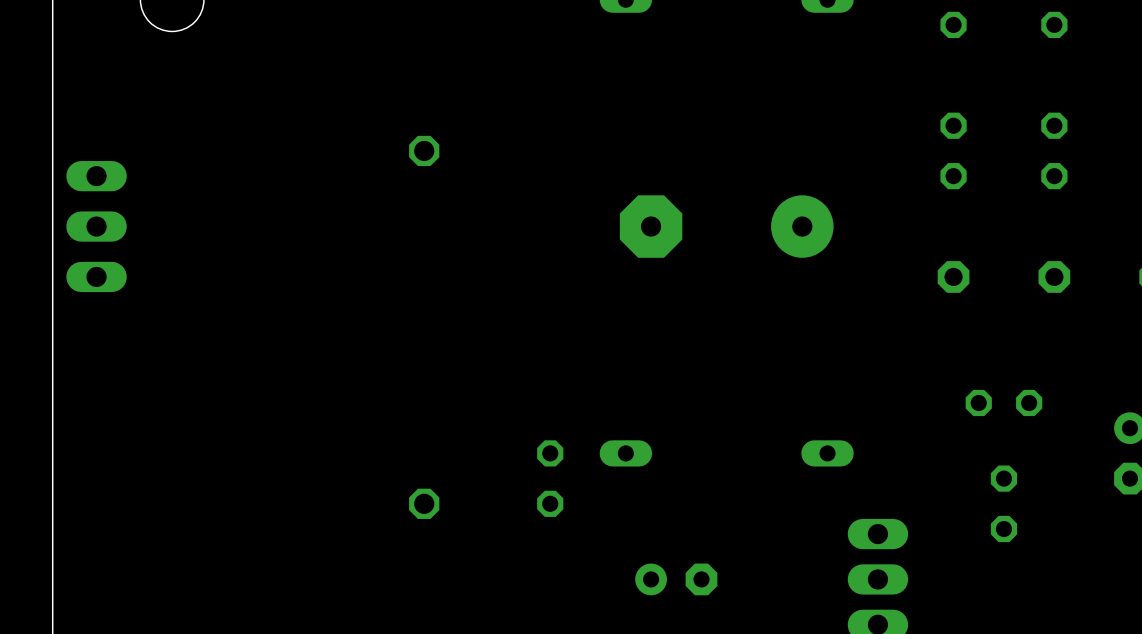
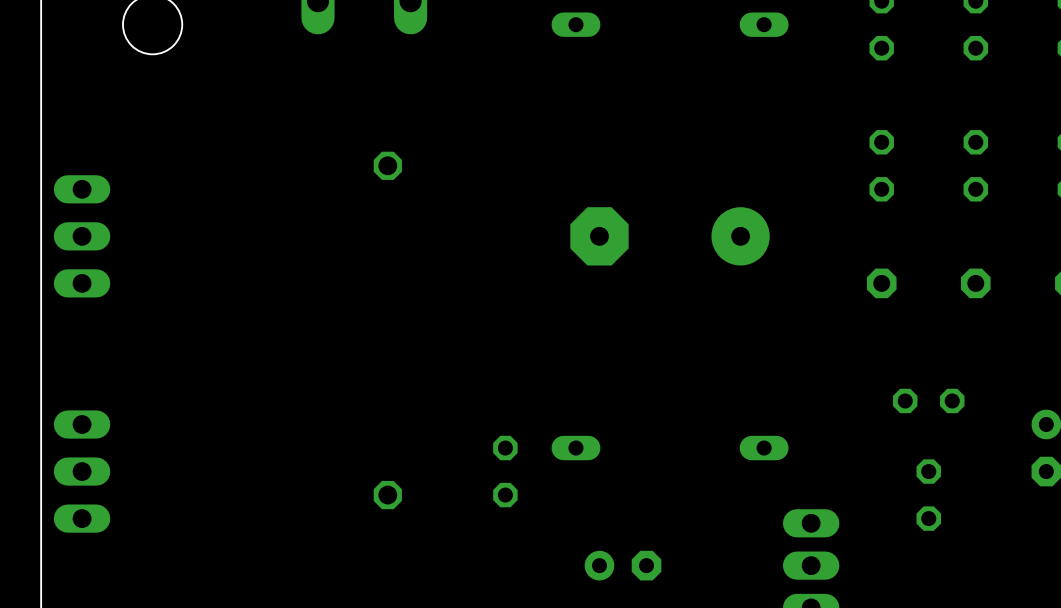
part: none -> (82, 471)

